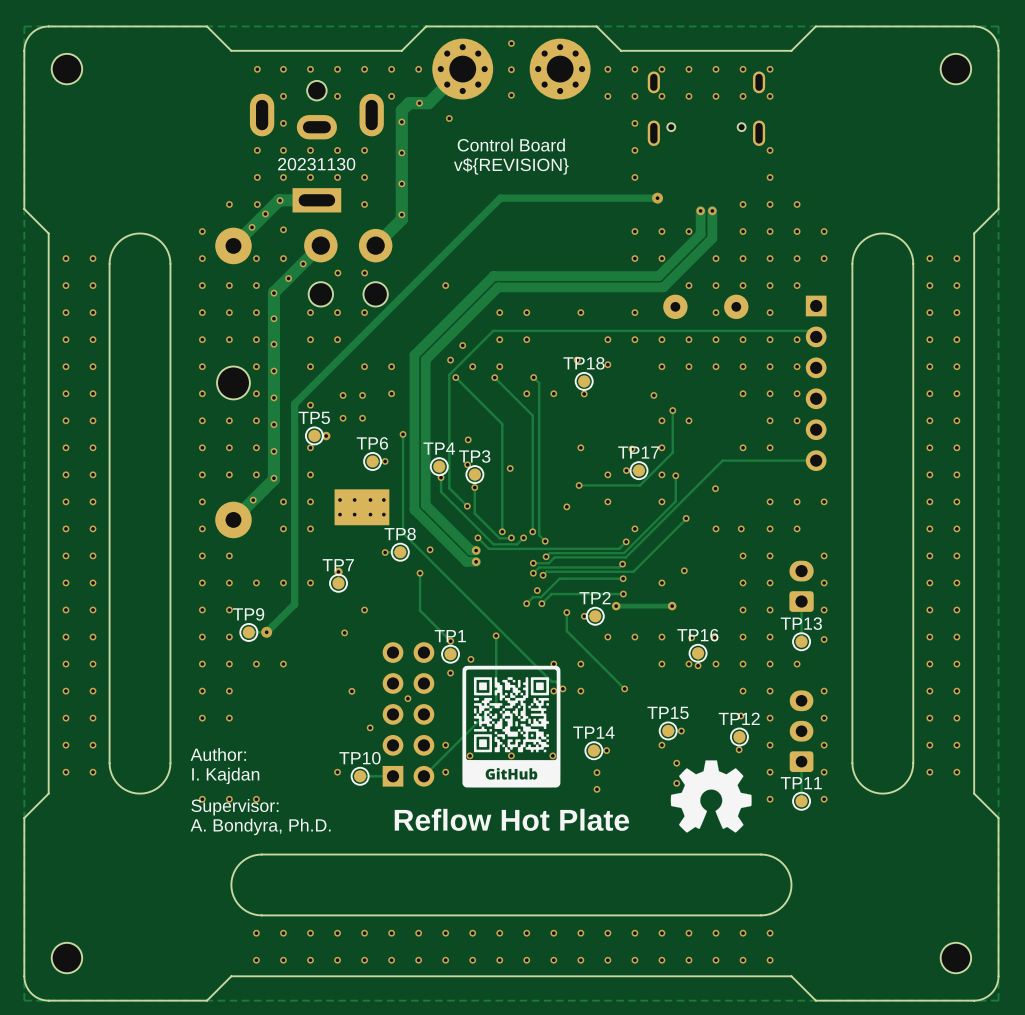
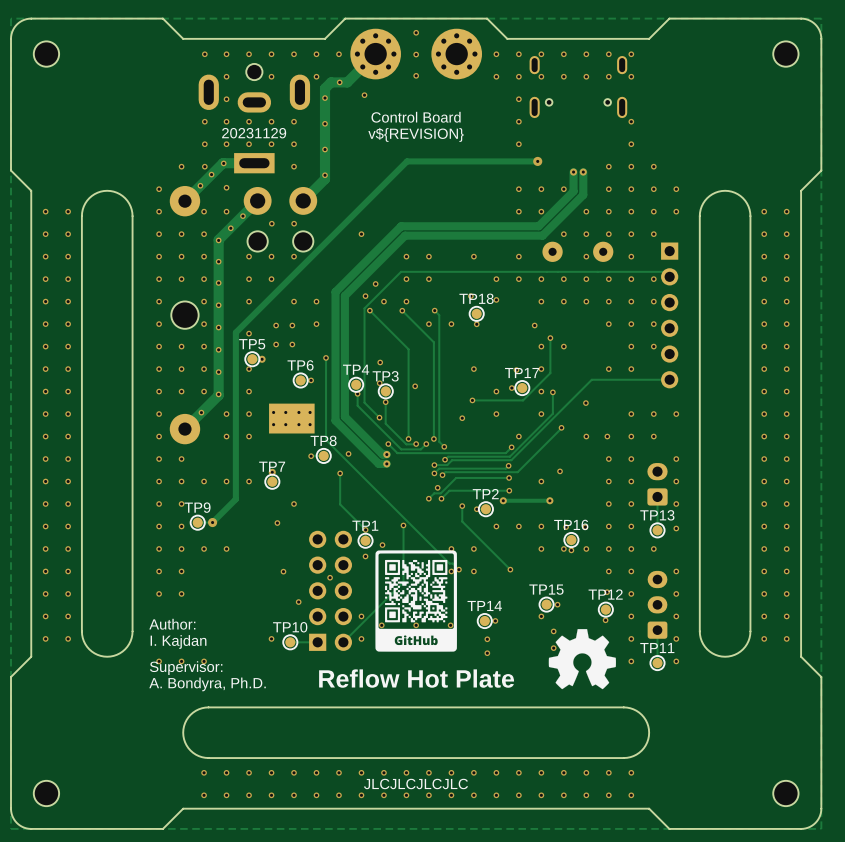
text: 20231130 (316, 164) -> 20231129 (254, 133)
text: none -> JLCJLCJLCJLC (416, 783)

